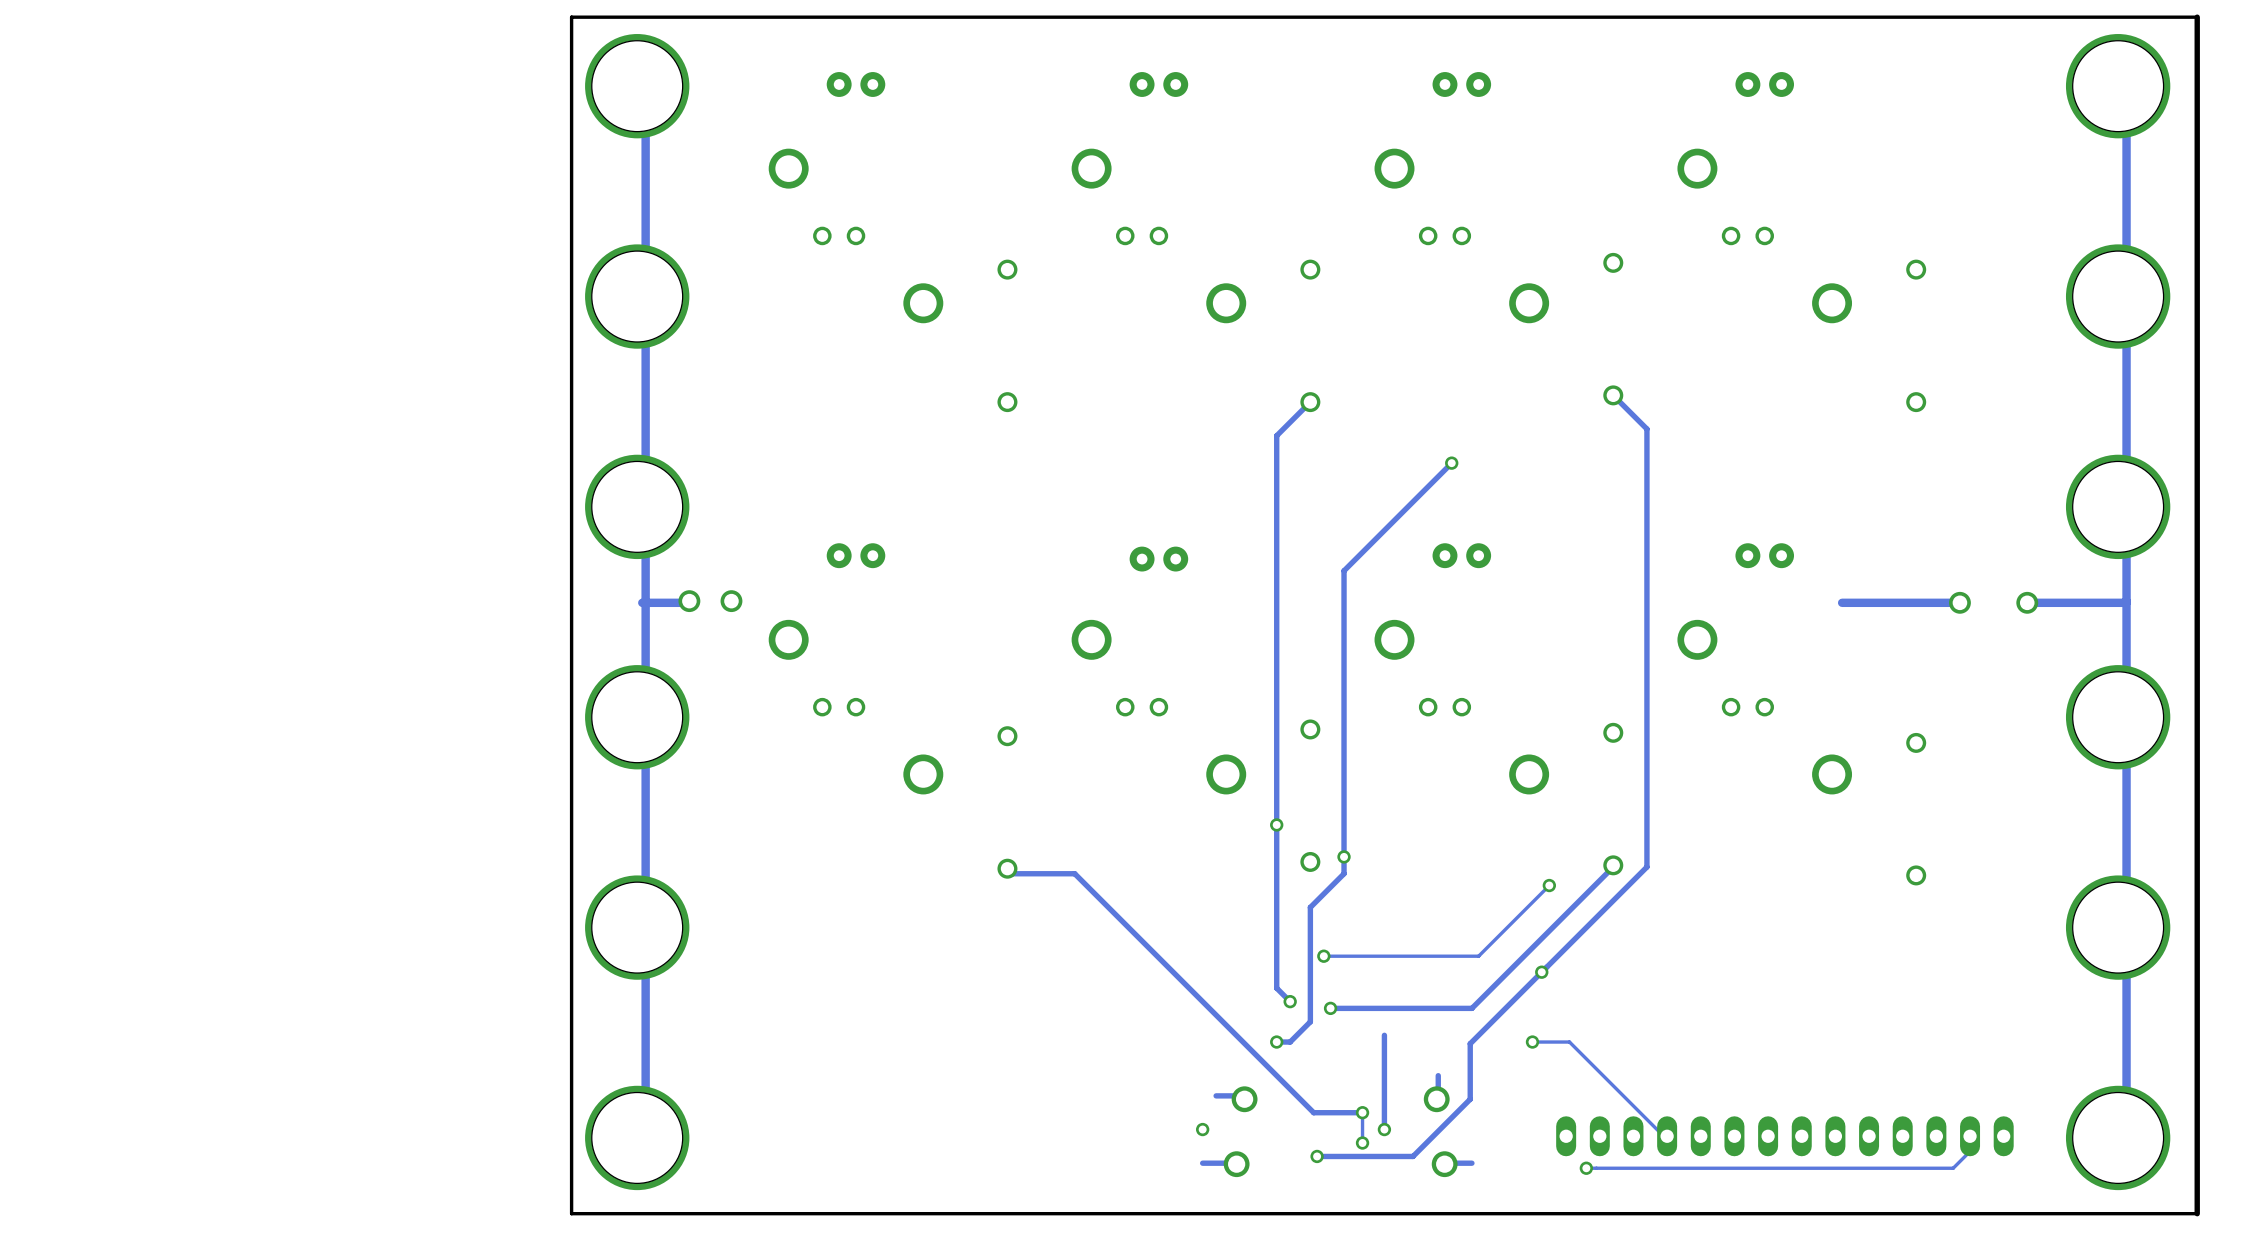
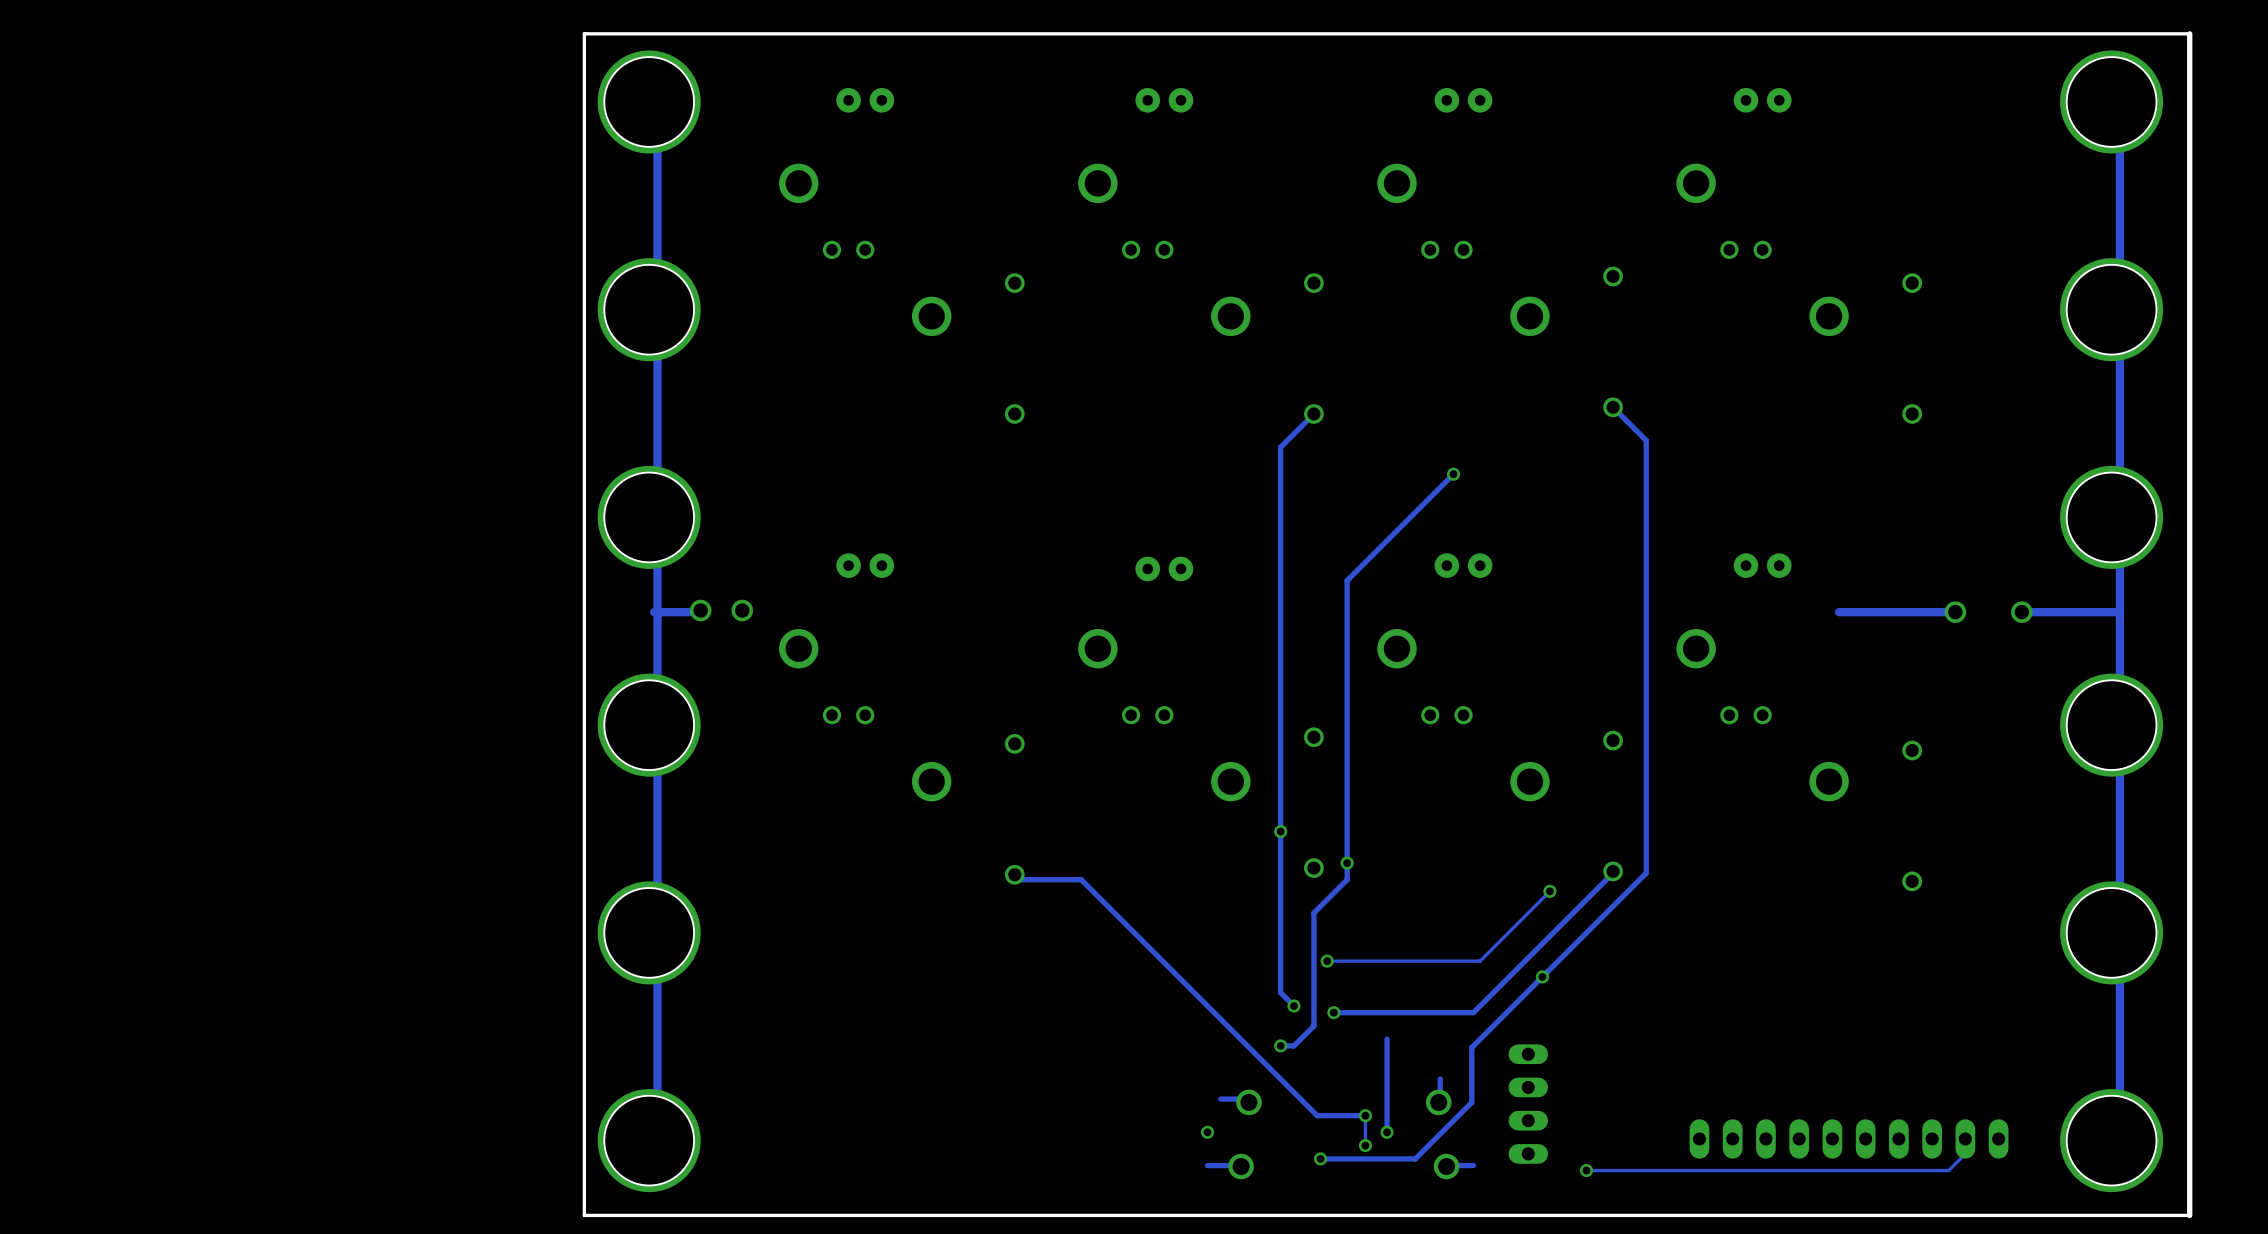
track: (1532, 1042) (1569, 1042) (1663, 1136) (1667, 1136) -> none
via: (1532, 1042) -> none
part rotation: 0° (1616, 1136) -> 90° clockwise (1528, 1104)
part position: (1616, 1136) -> (1528, 1104)

